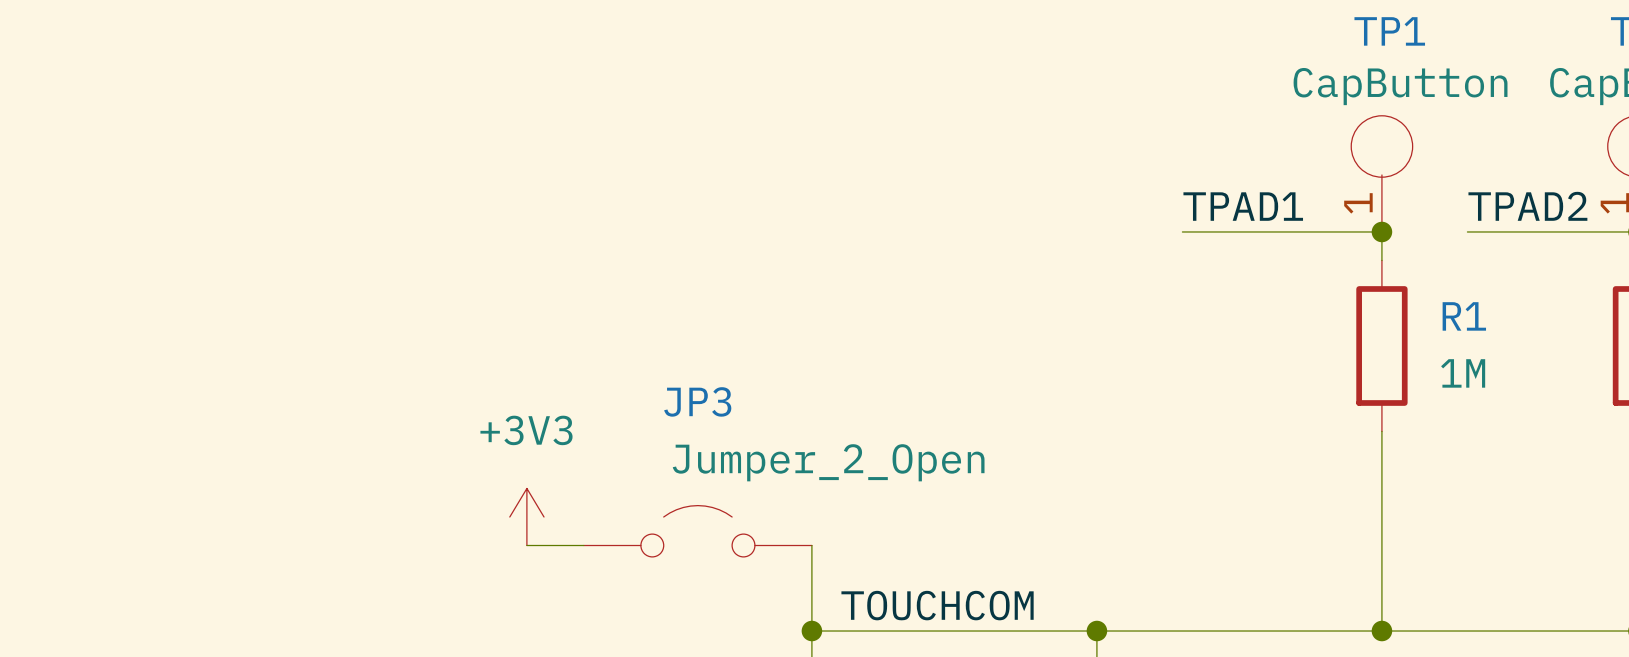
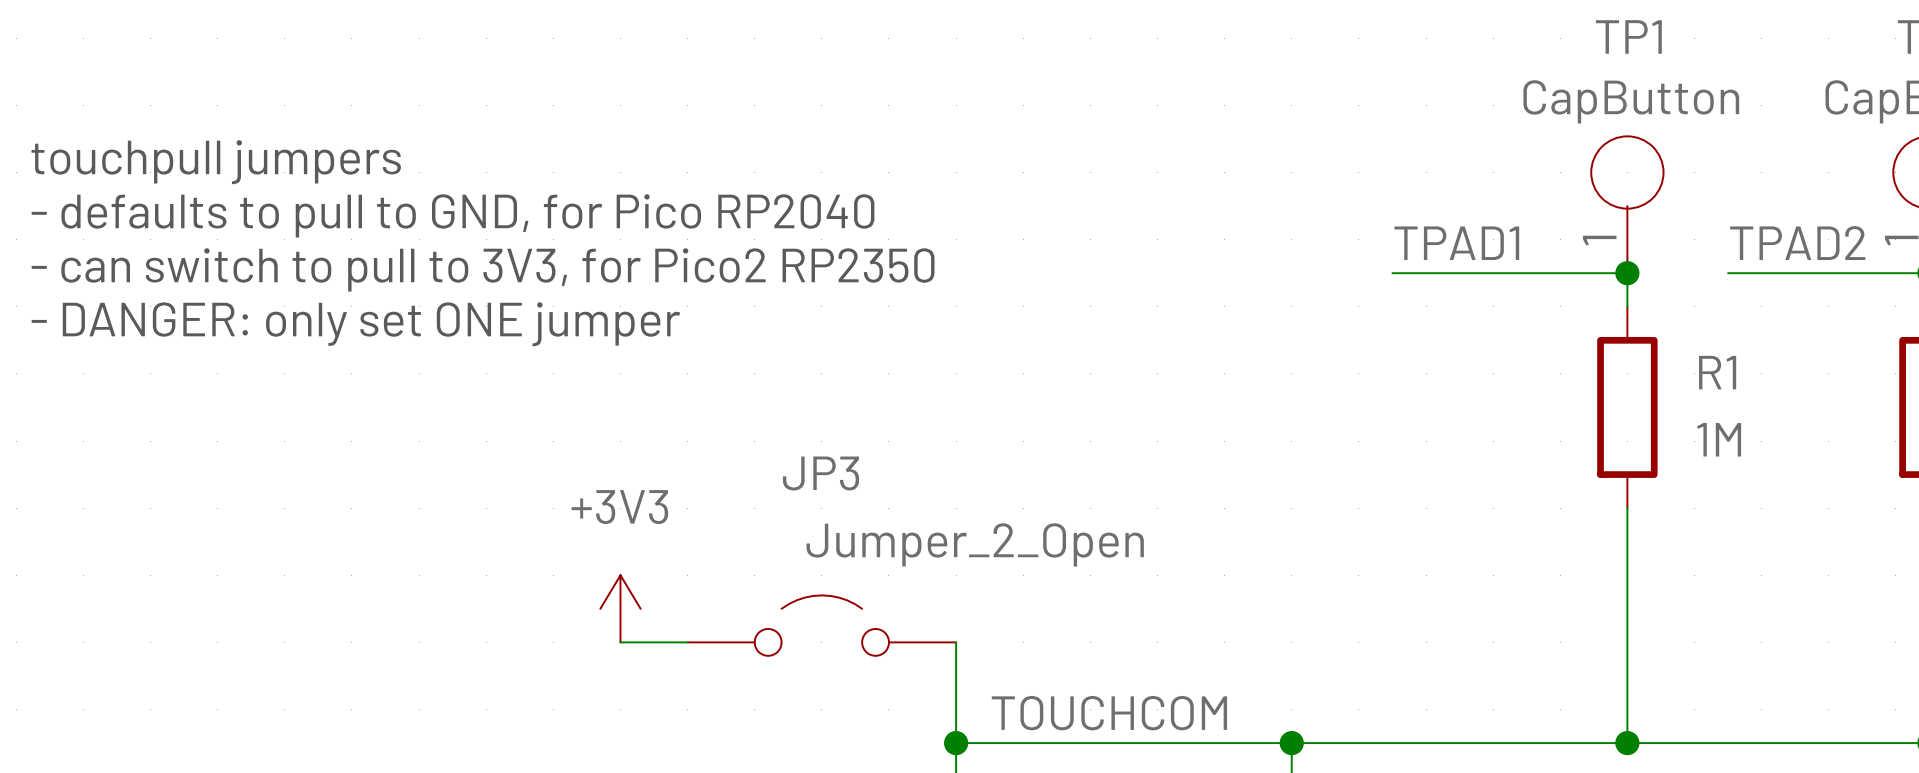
text: none -> touchpull jumpers (216, 162)
text: none -> - defaults to pull to GND, for Pico RP2040 (453, 215)
text: none -> - can switch to pull to 3V3, for Pico2 RP2350 (483, 269)
text: none -> - DANGER: only set ONE jumper (355, 324)

